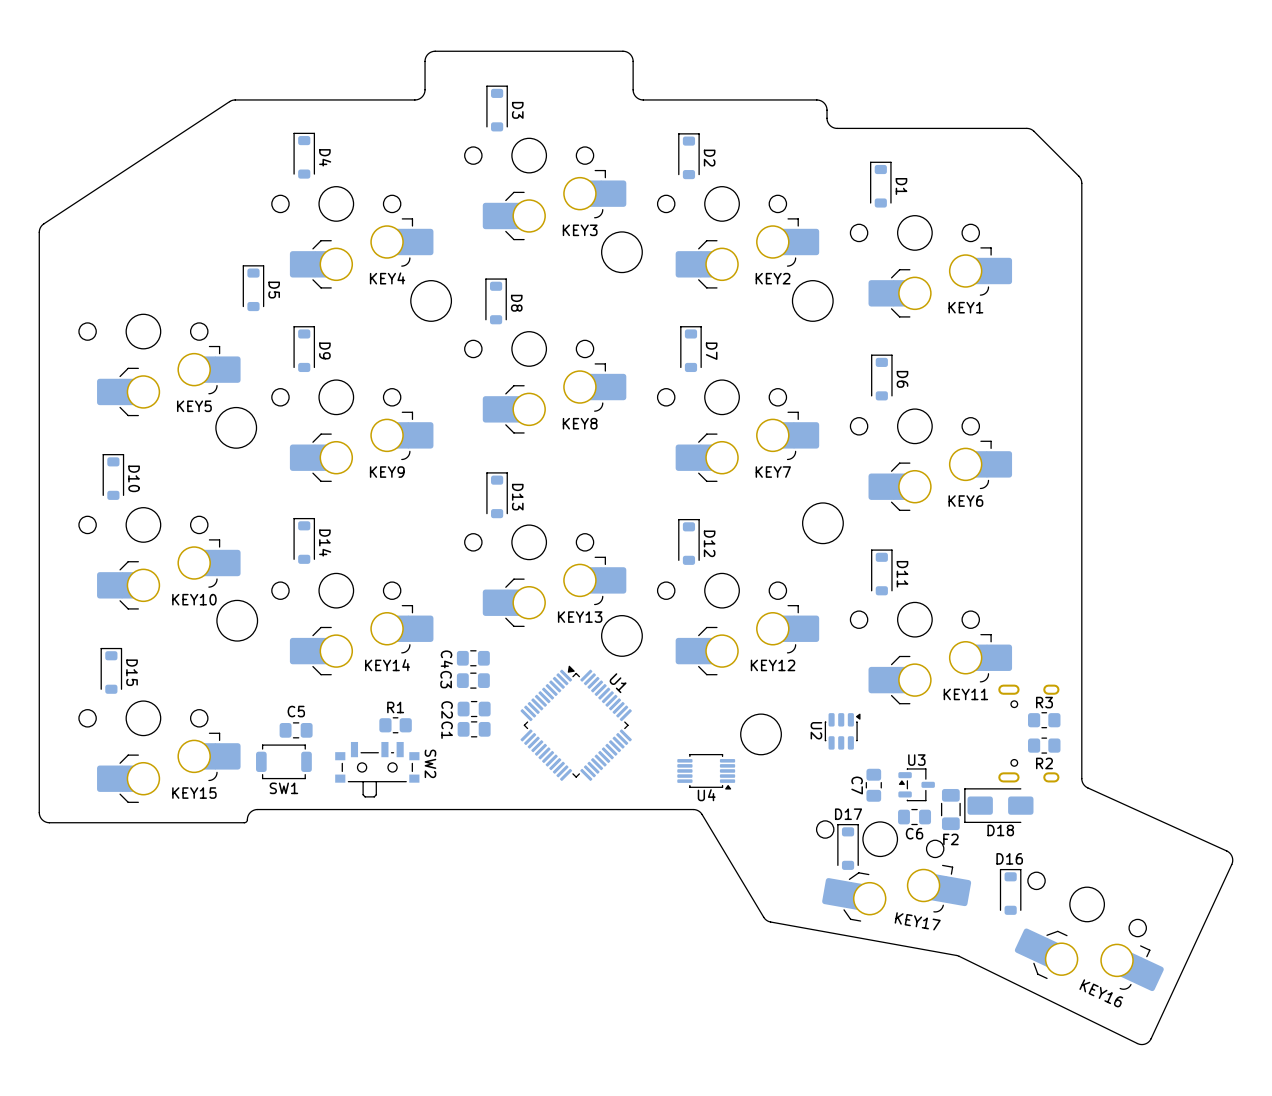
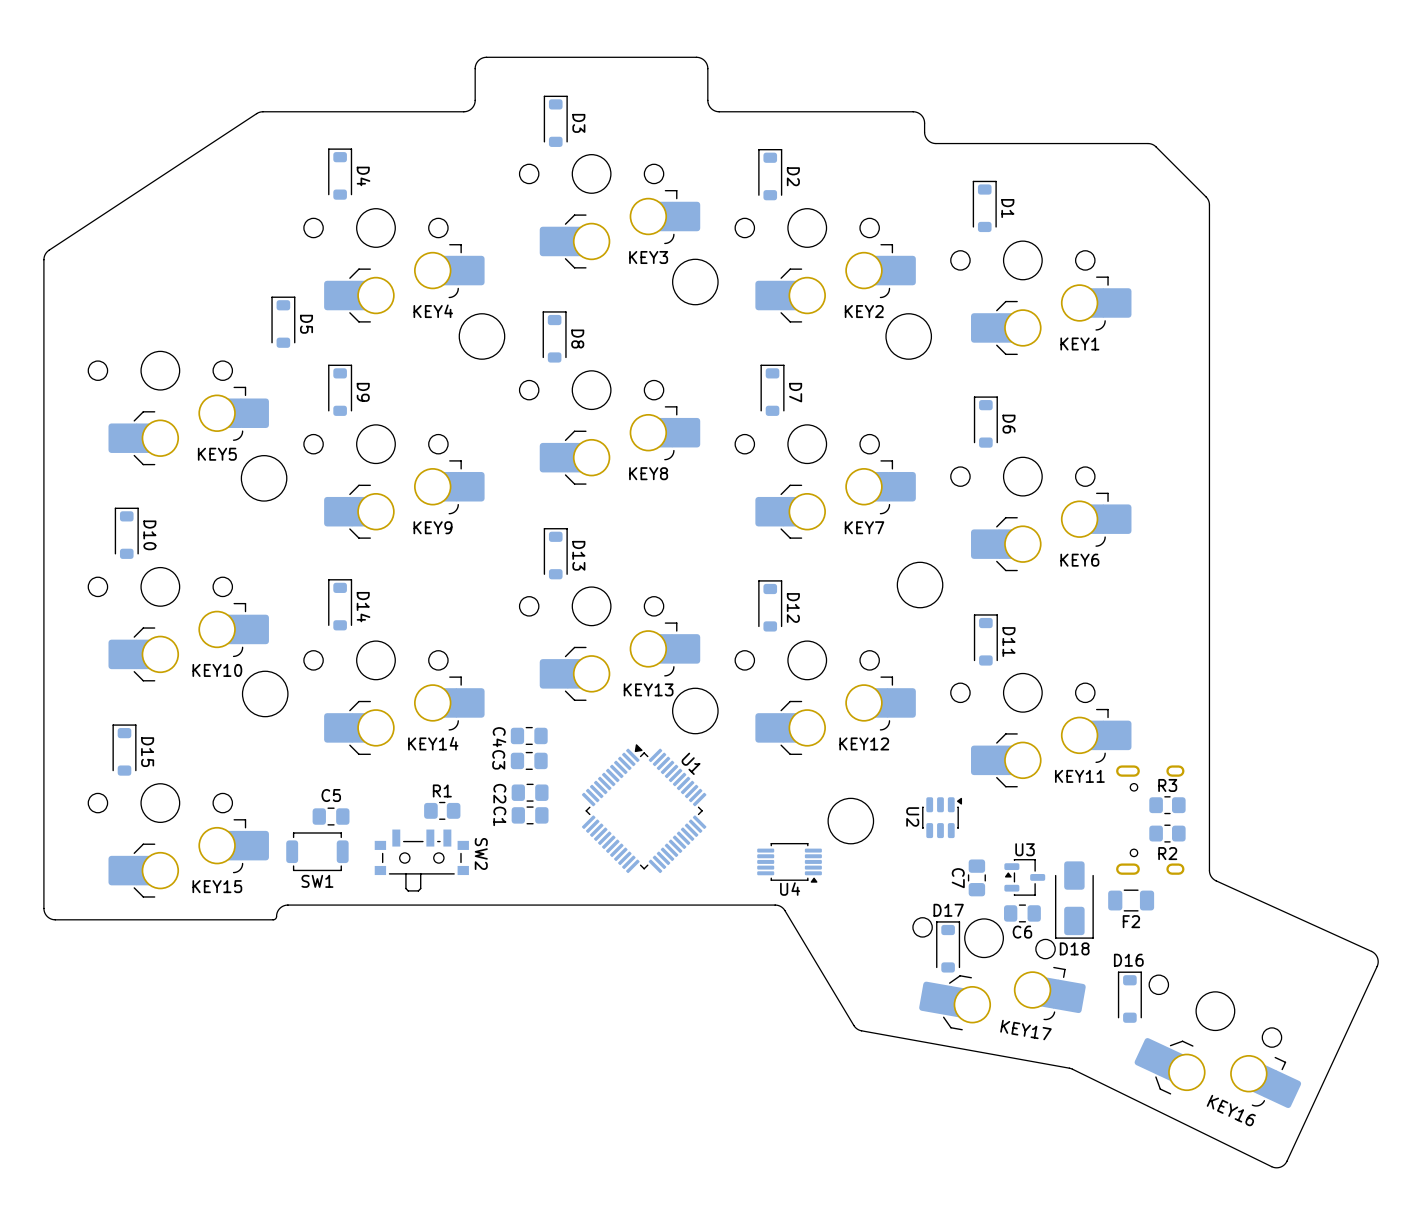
D18 rotation: 0° (998, 805) -> 90° counterclockwise (1074, 900)
F2 rotation: 0° (950, 809) -> 90° clockwise (1131, 900)
F2 position: (950, 809) -> (1131, 900)

